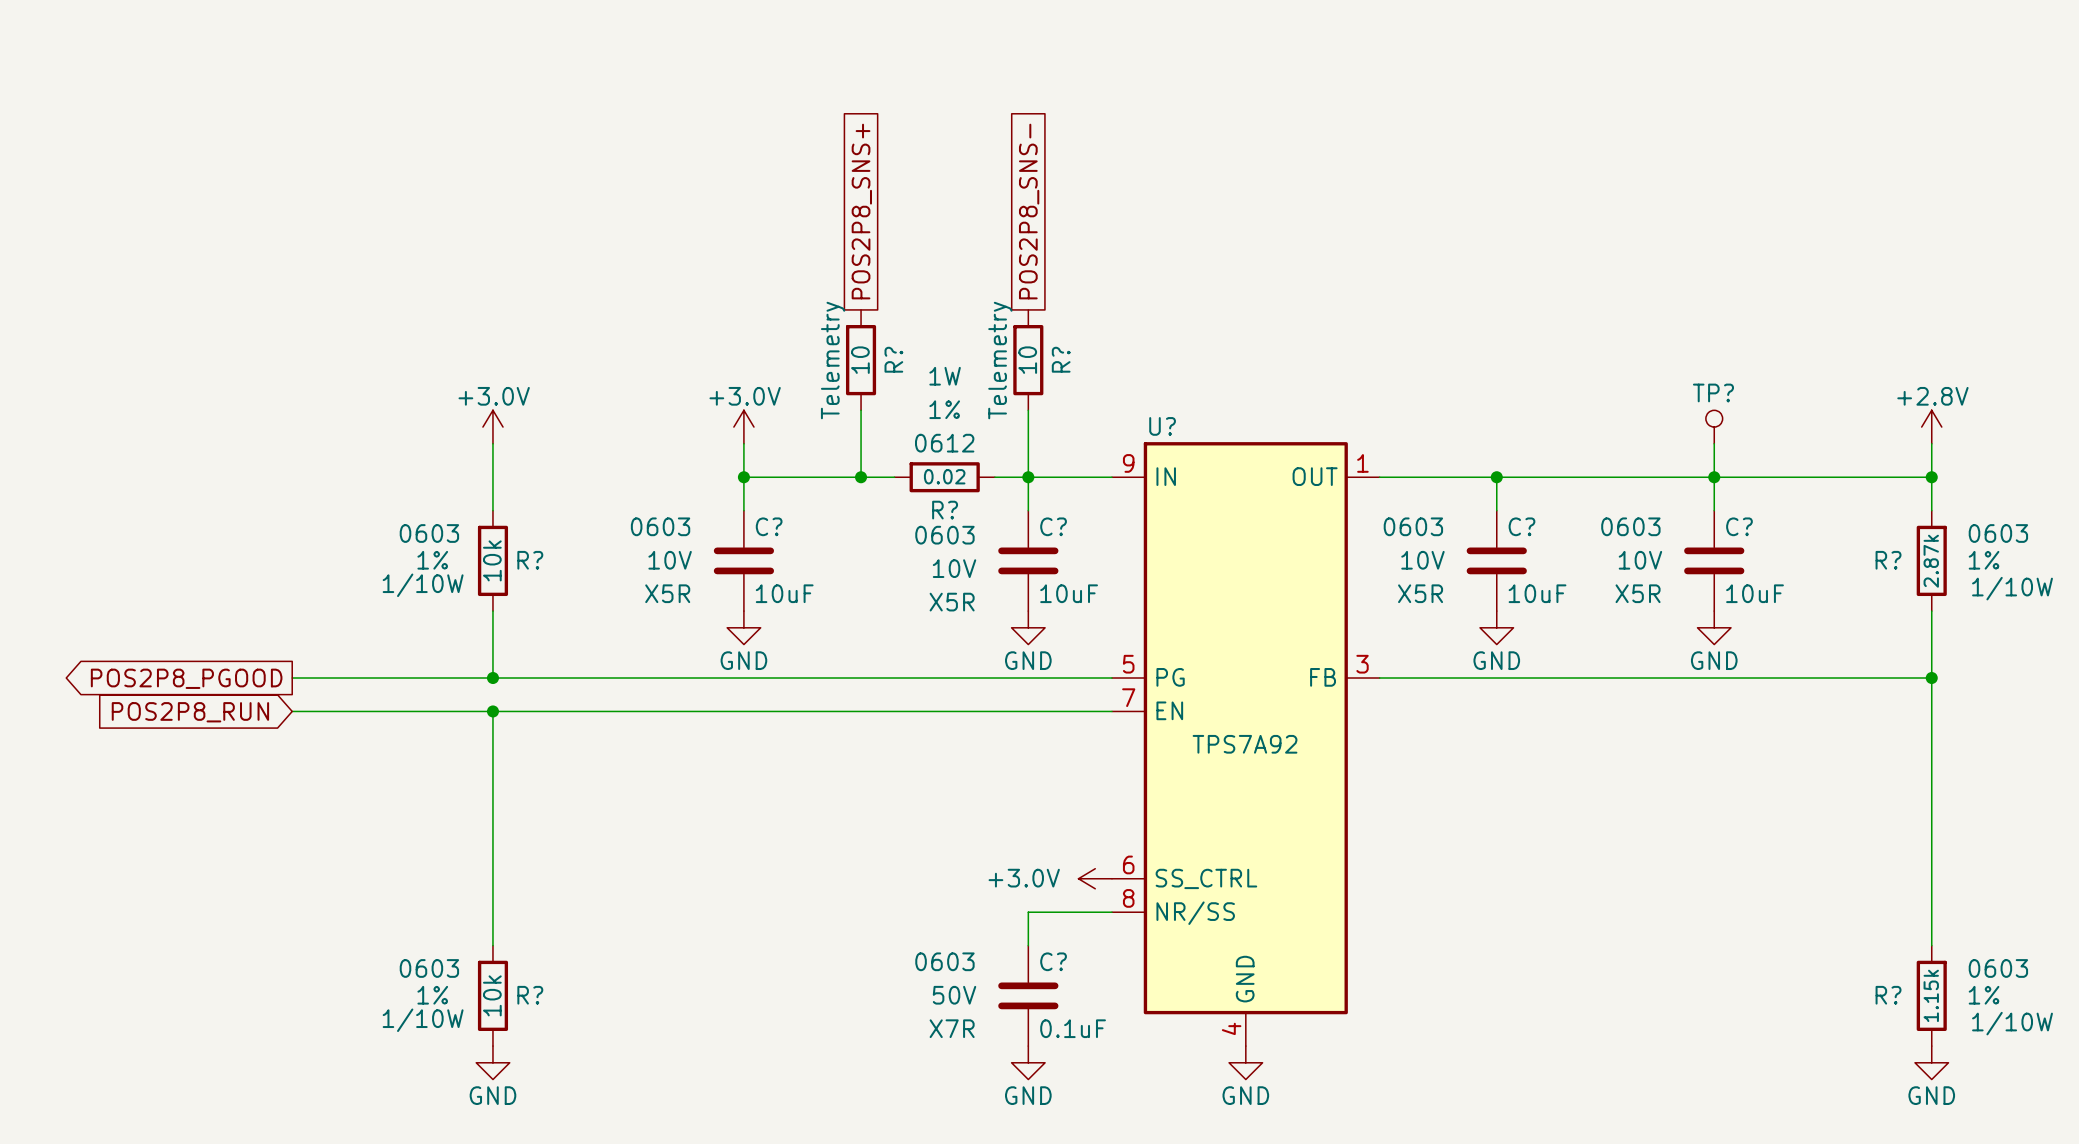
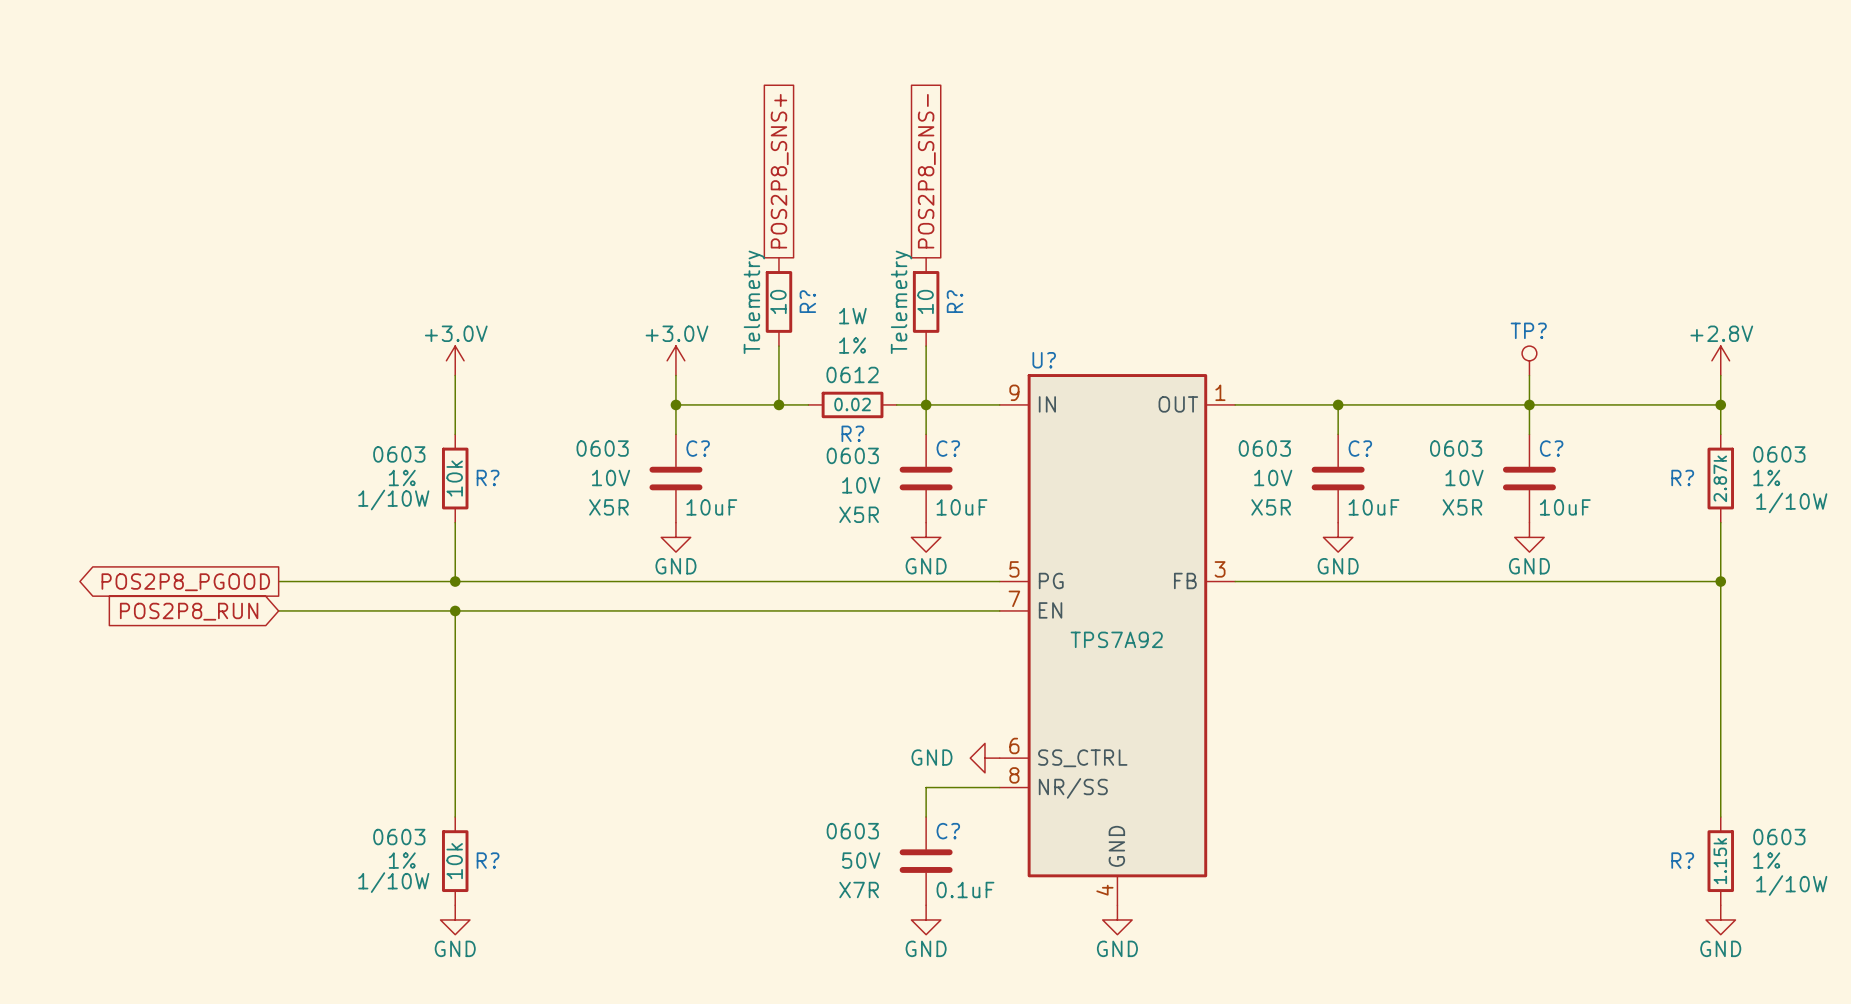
power symbol: +3.0V (1095, 878) -> GND (984, 758)

